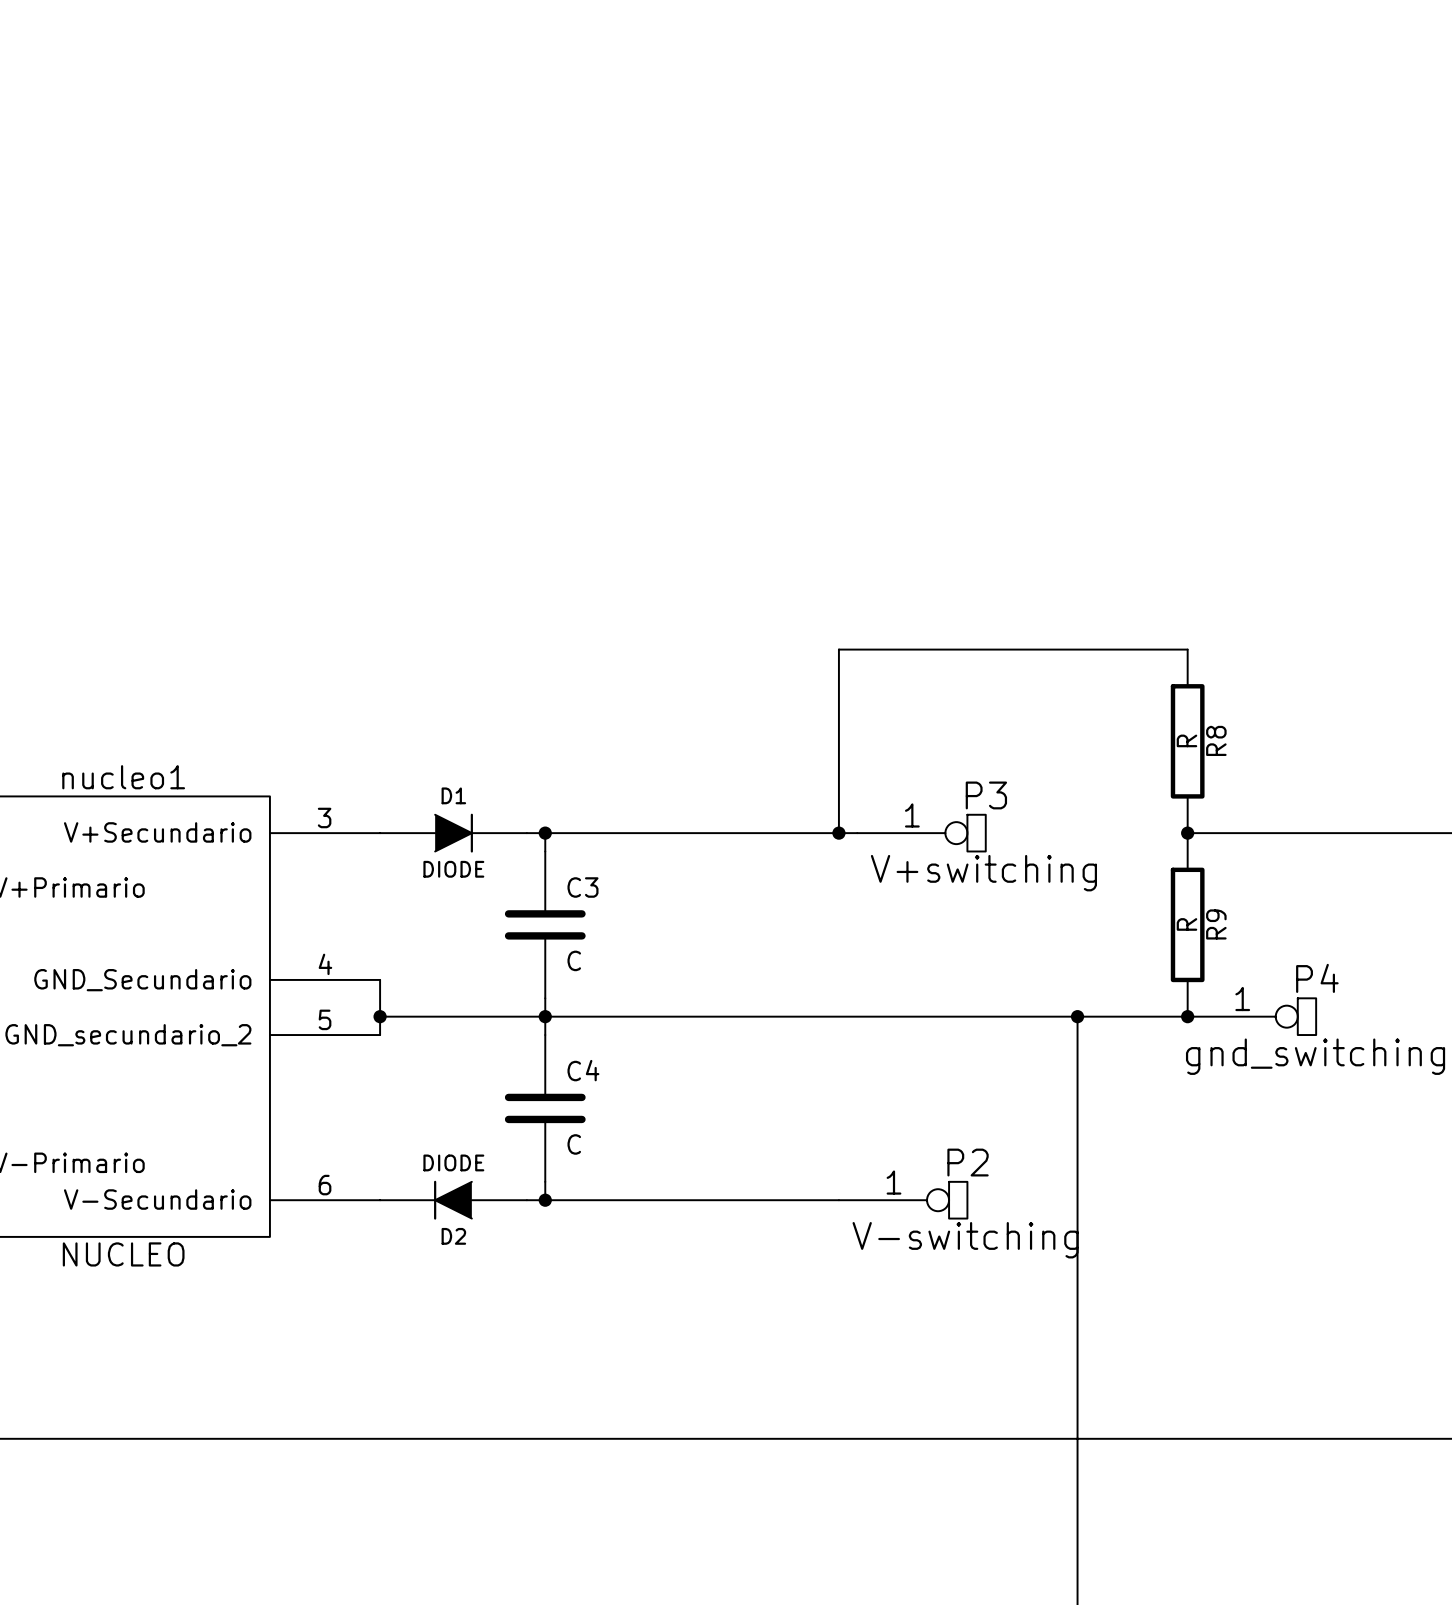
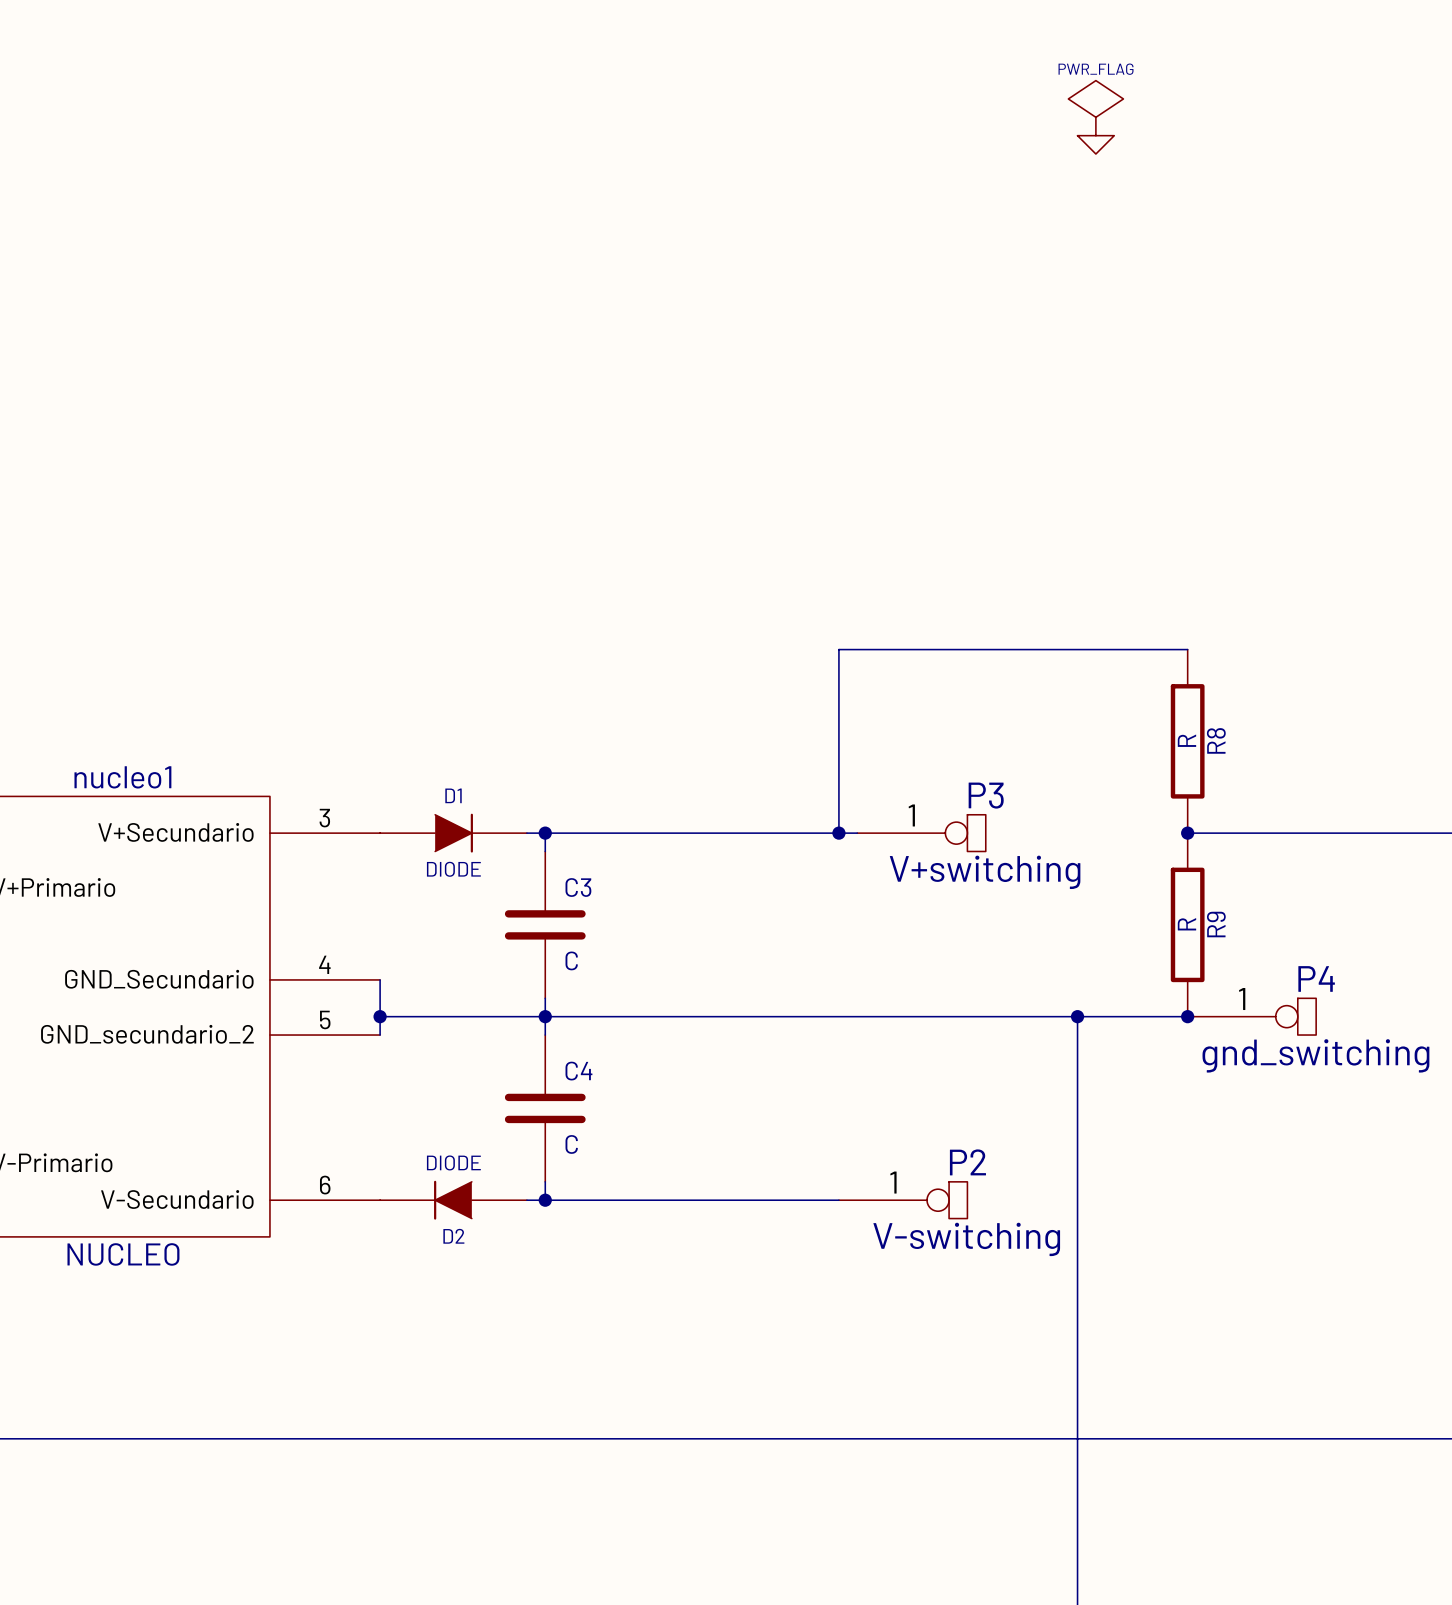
power symbol: none -> PWR_FLAG (1095, 108)
power symbol: none -> (1095, 144)

